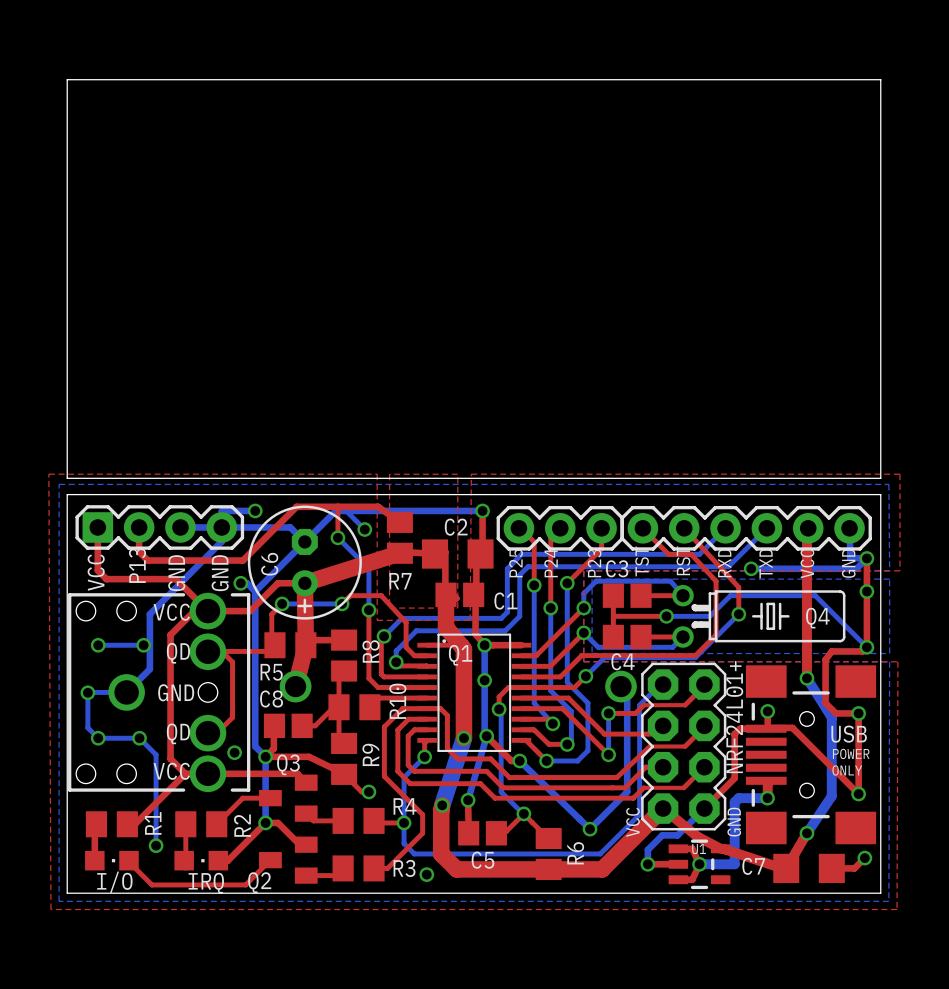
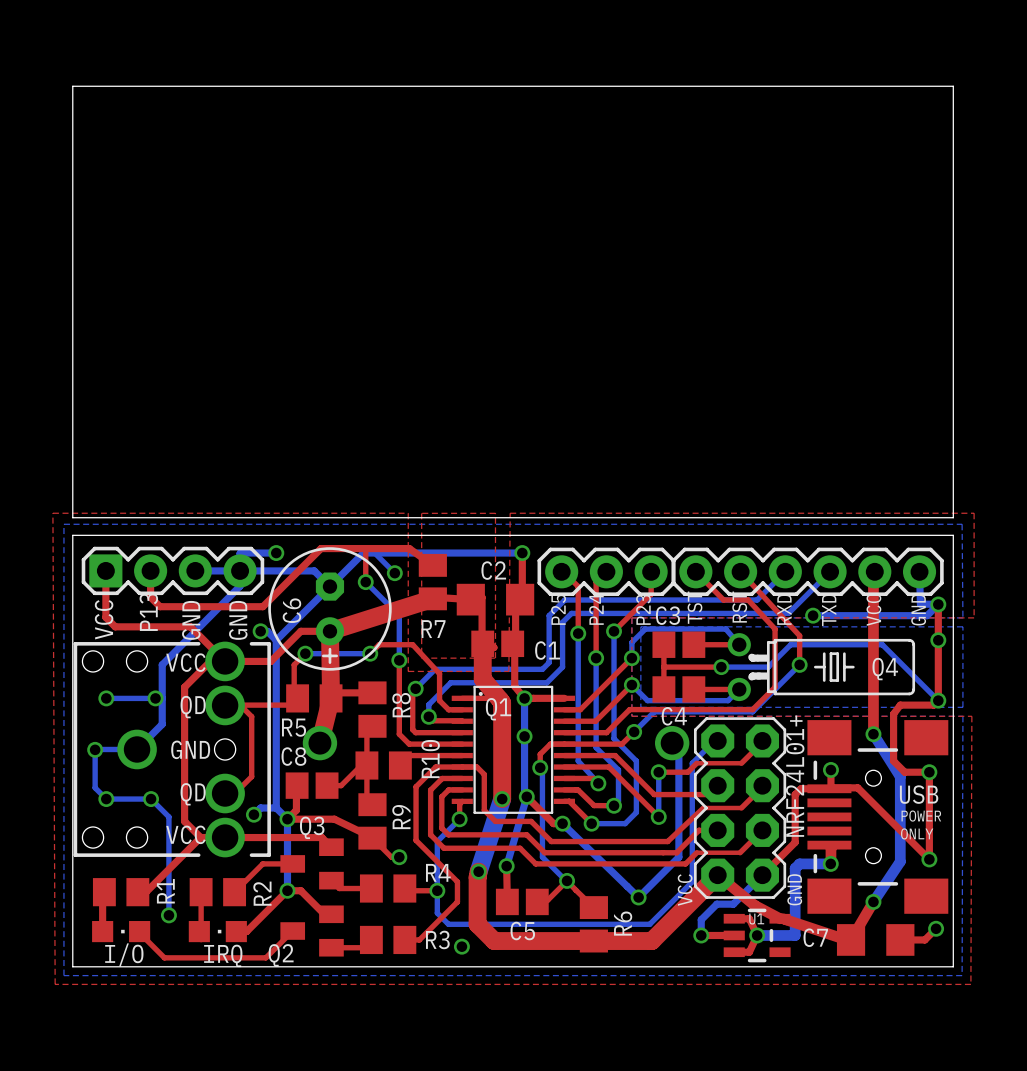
bottom track: none -> (276, 808) (260, 808) (253, 814)

